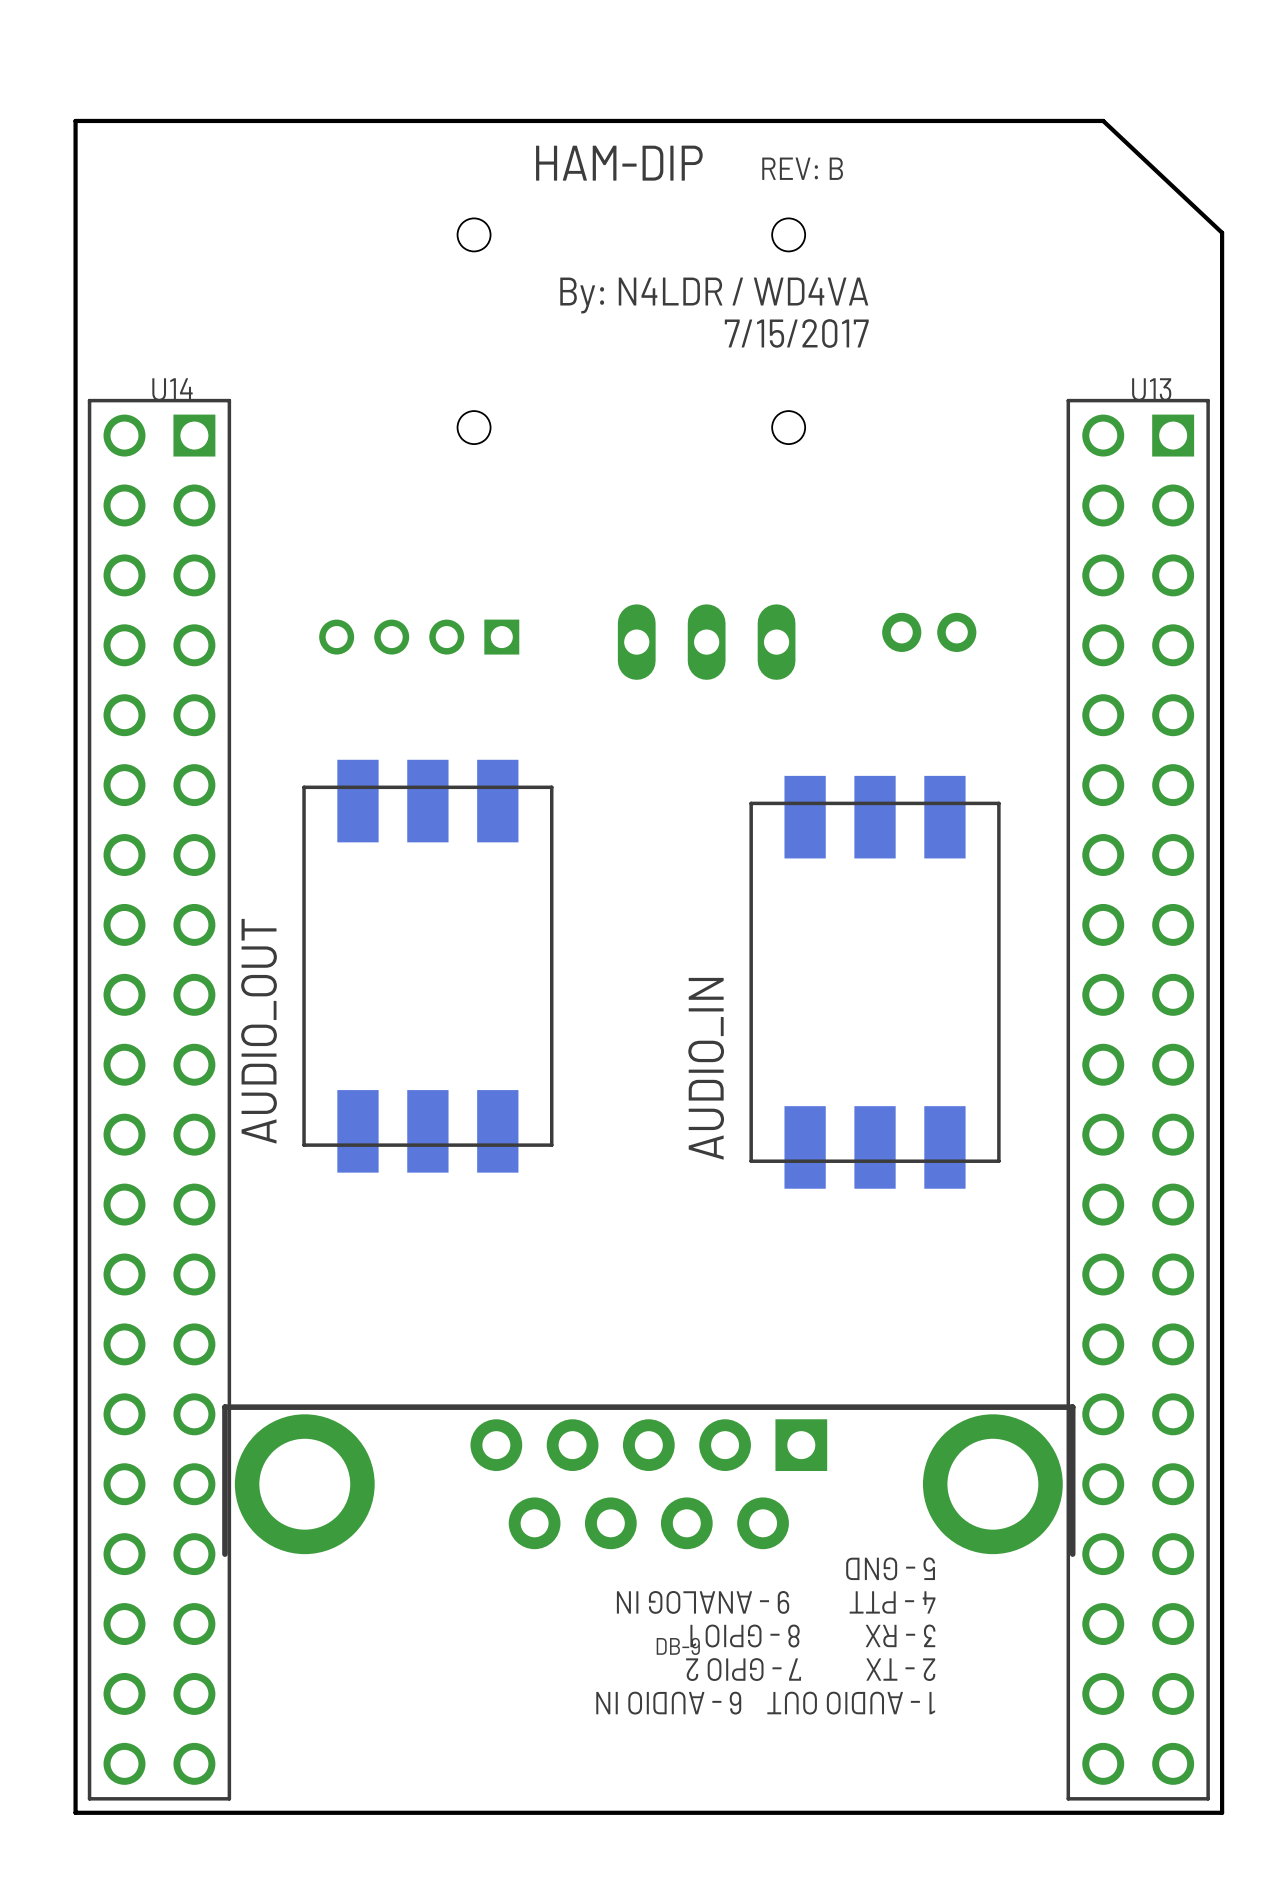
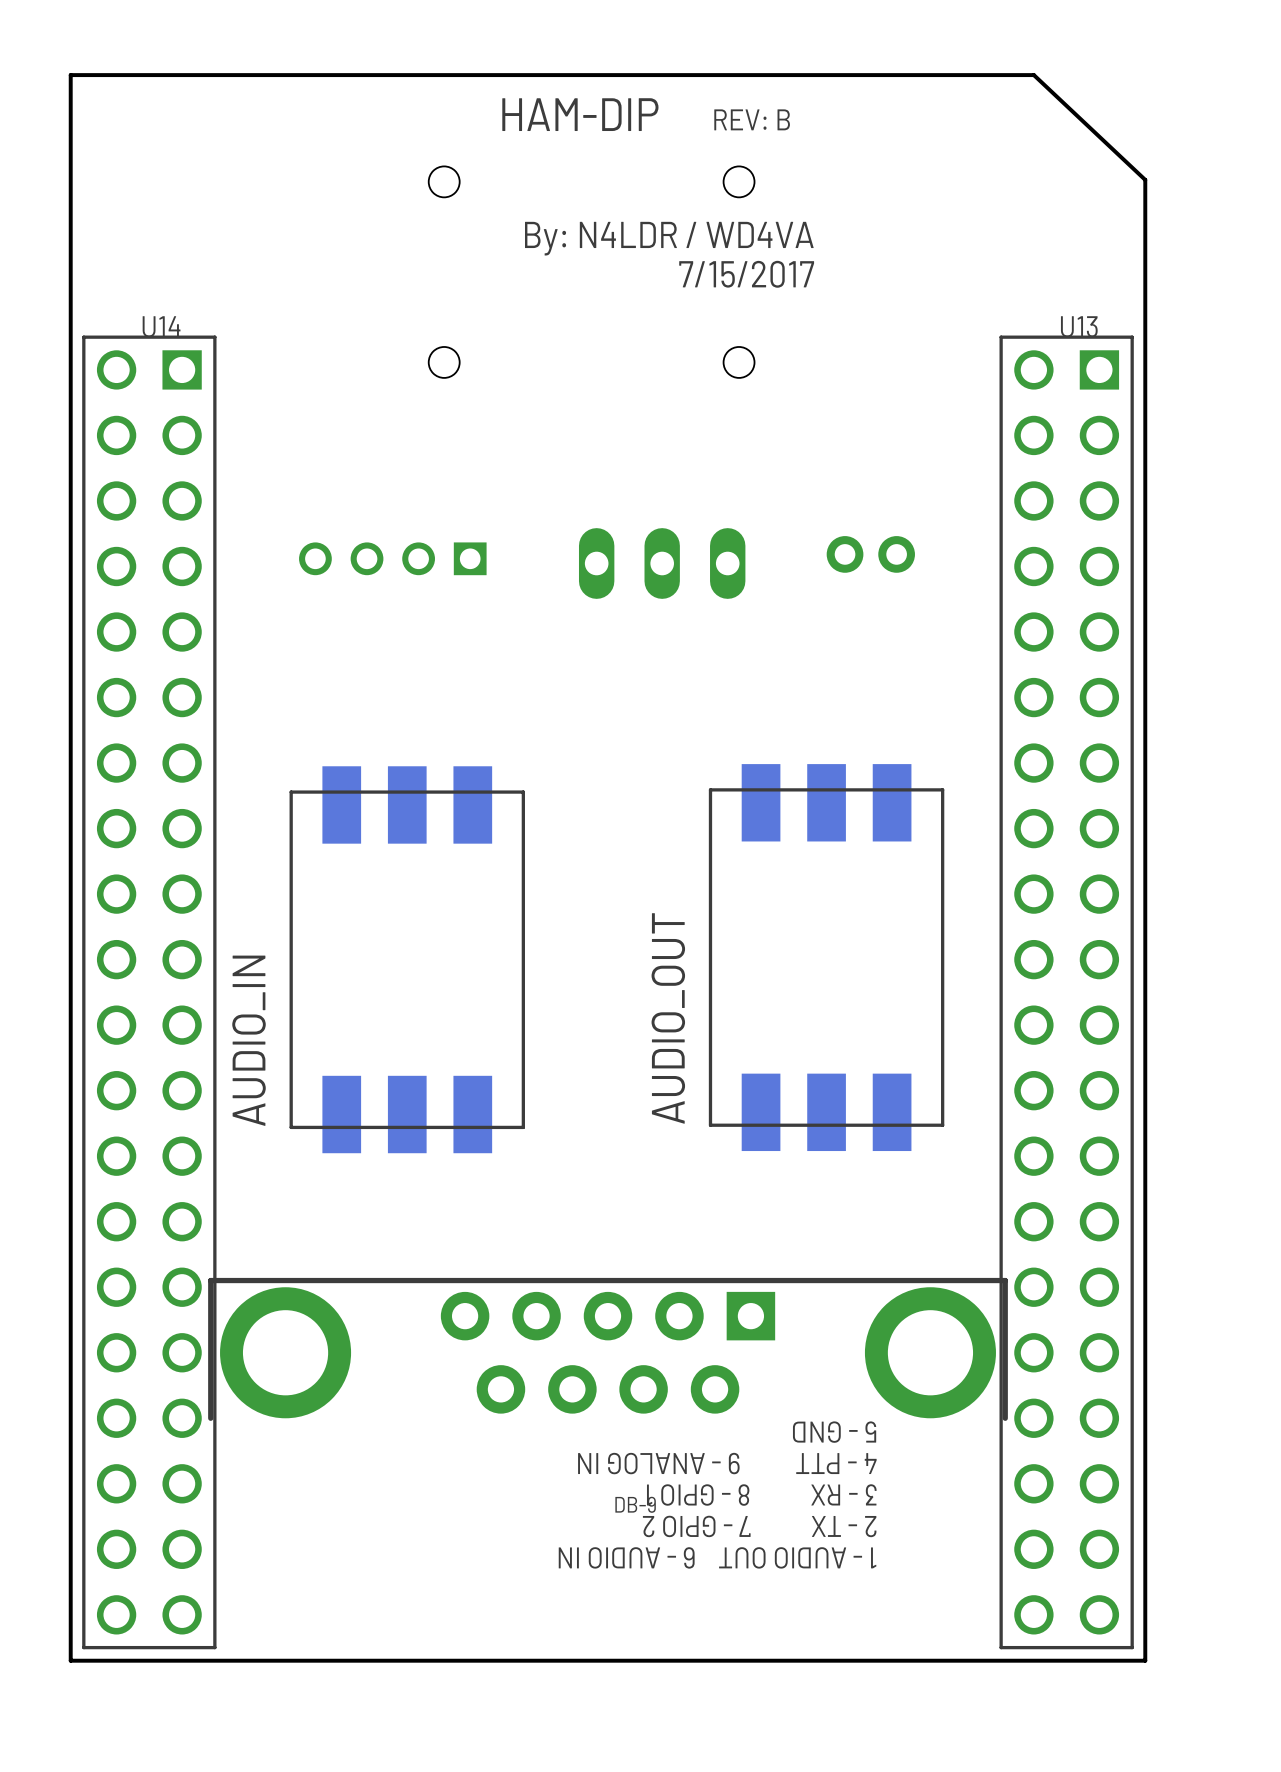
AUDIO_OUT position: (427, 966) -> (826, 957)
AUDIO_IN position: (875, 982) -> (407, 959)

